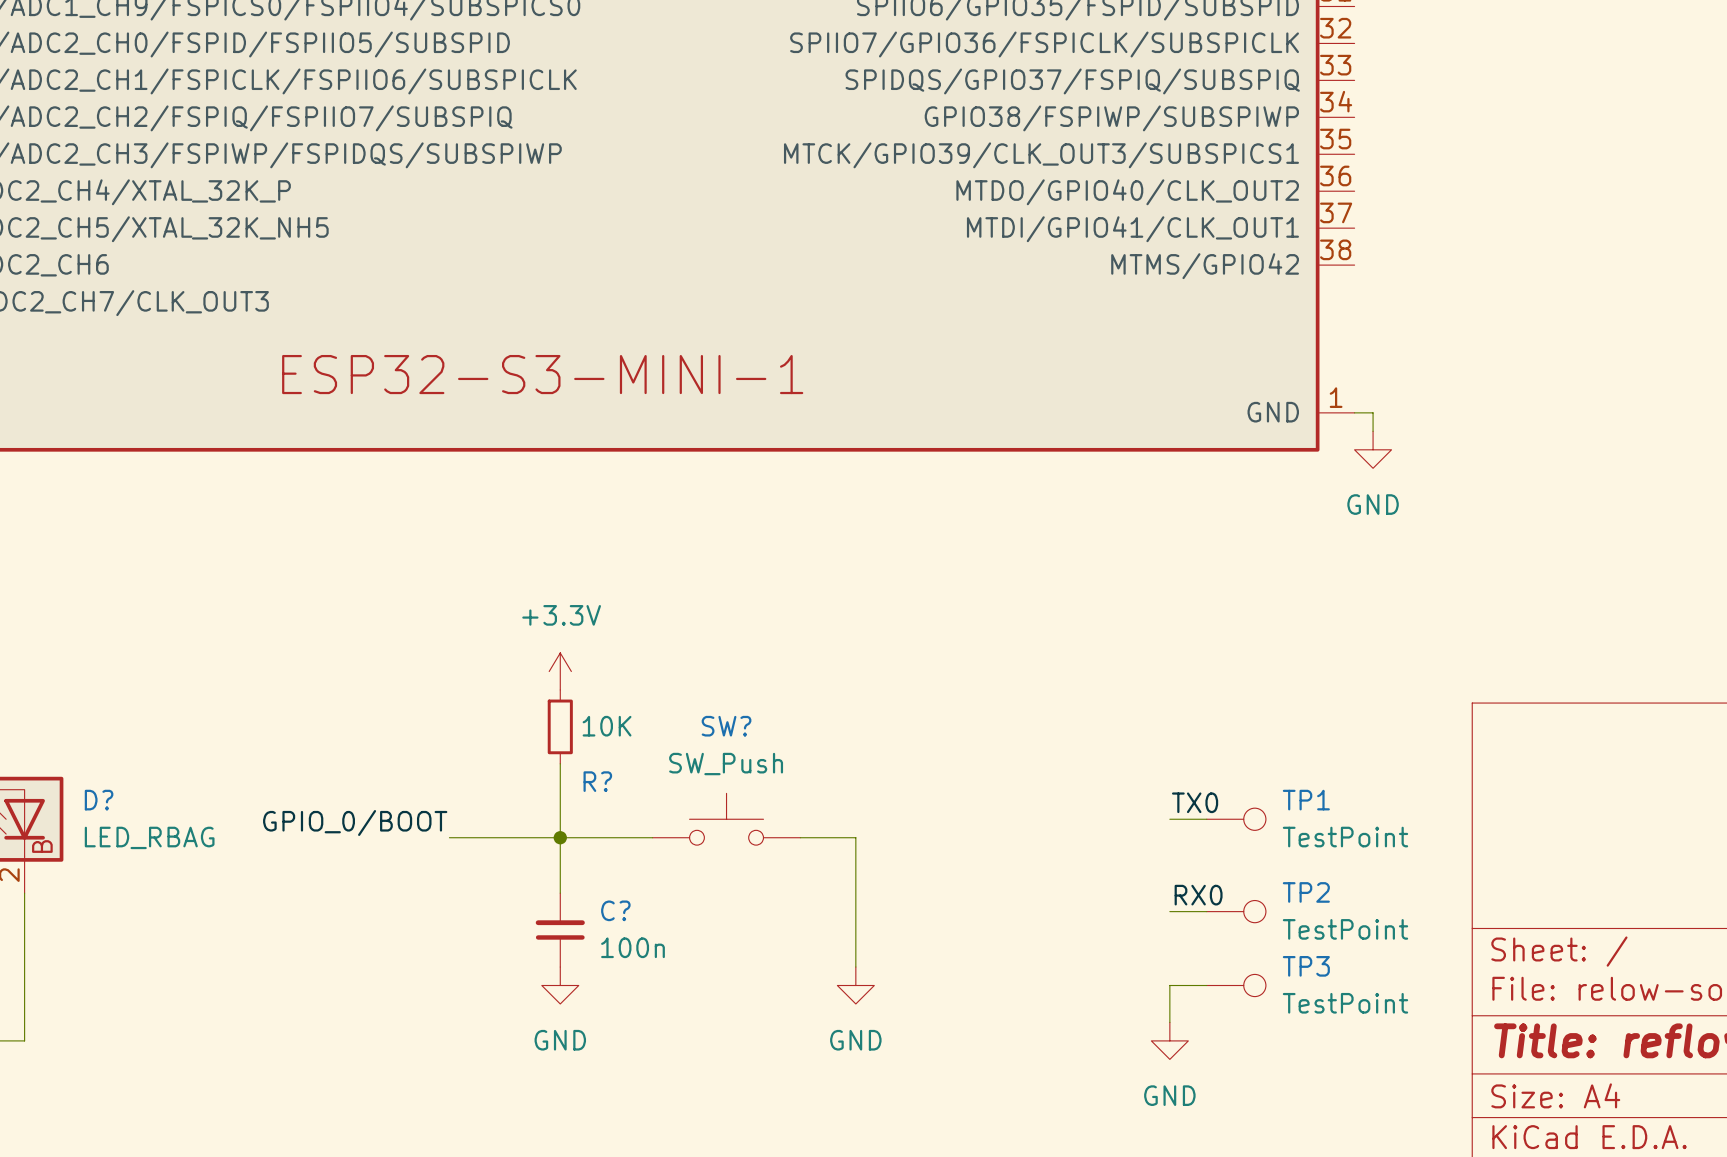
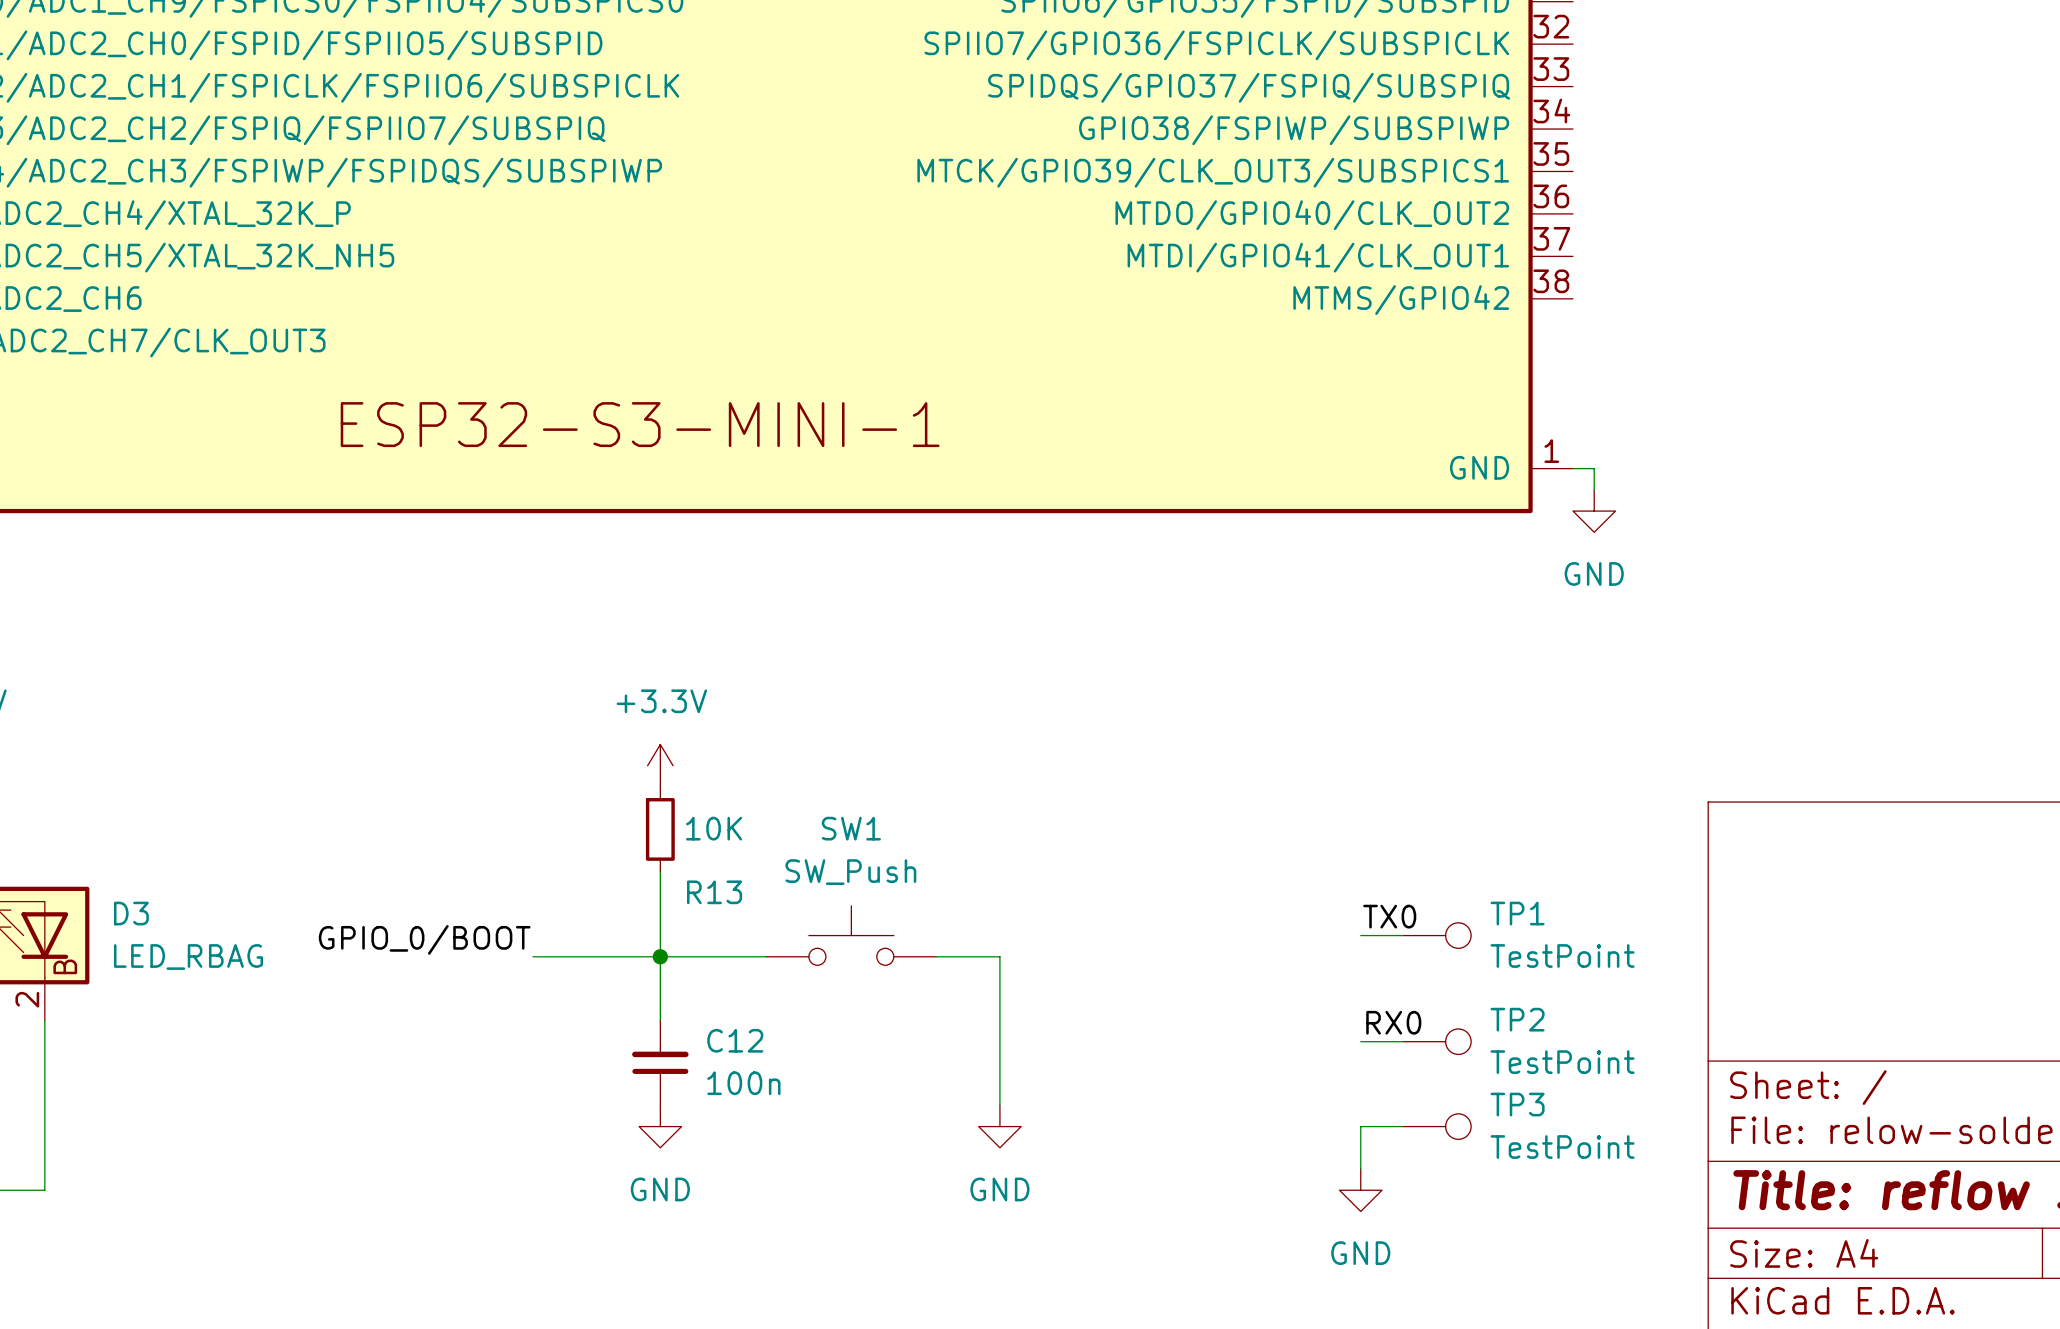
SW? name: SW? (726, 726) -> SW1 (851, 828)
R? name: R? (597, 781) -> R13 (714, 892)
D? name: D? (99, 800) -> D3 (131, 913)
C? name: C? (615, 910) -> C12 (735, 1040)

